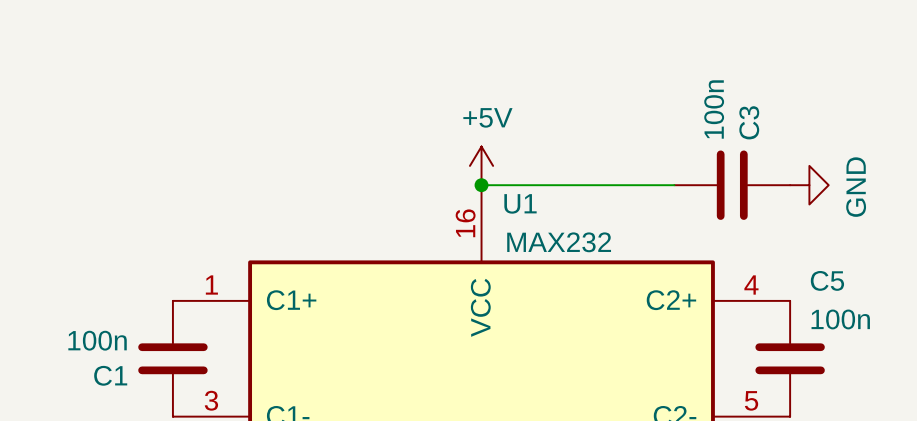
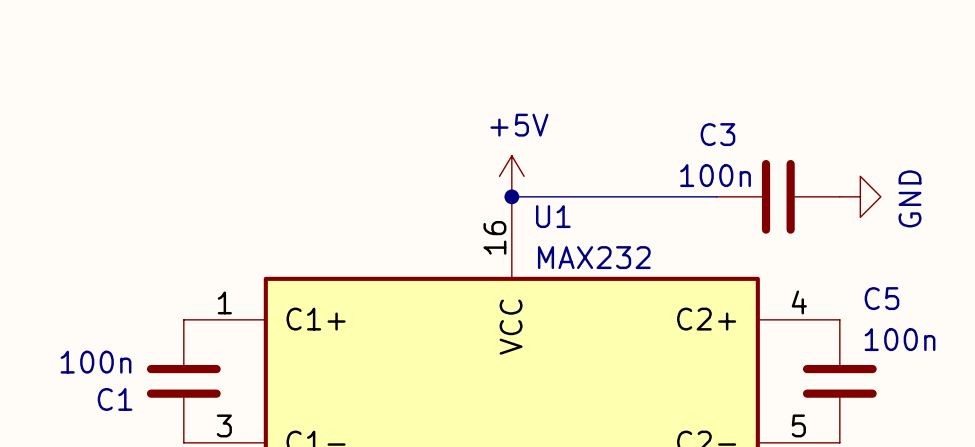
C3 value rotation: 0° (714, 109) -> 90° clockwise (715, 175)
C3 name rotation: 0° (749, 122) -> 90° clockwise (717, 134)
C3 name position: C3 (749, 122) -> C3 (717, 134)

